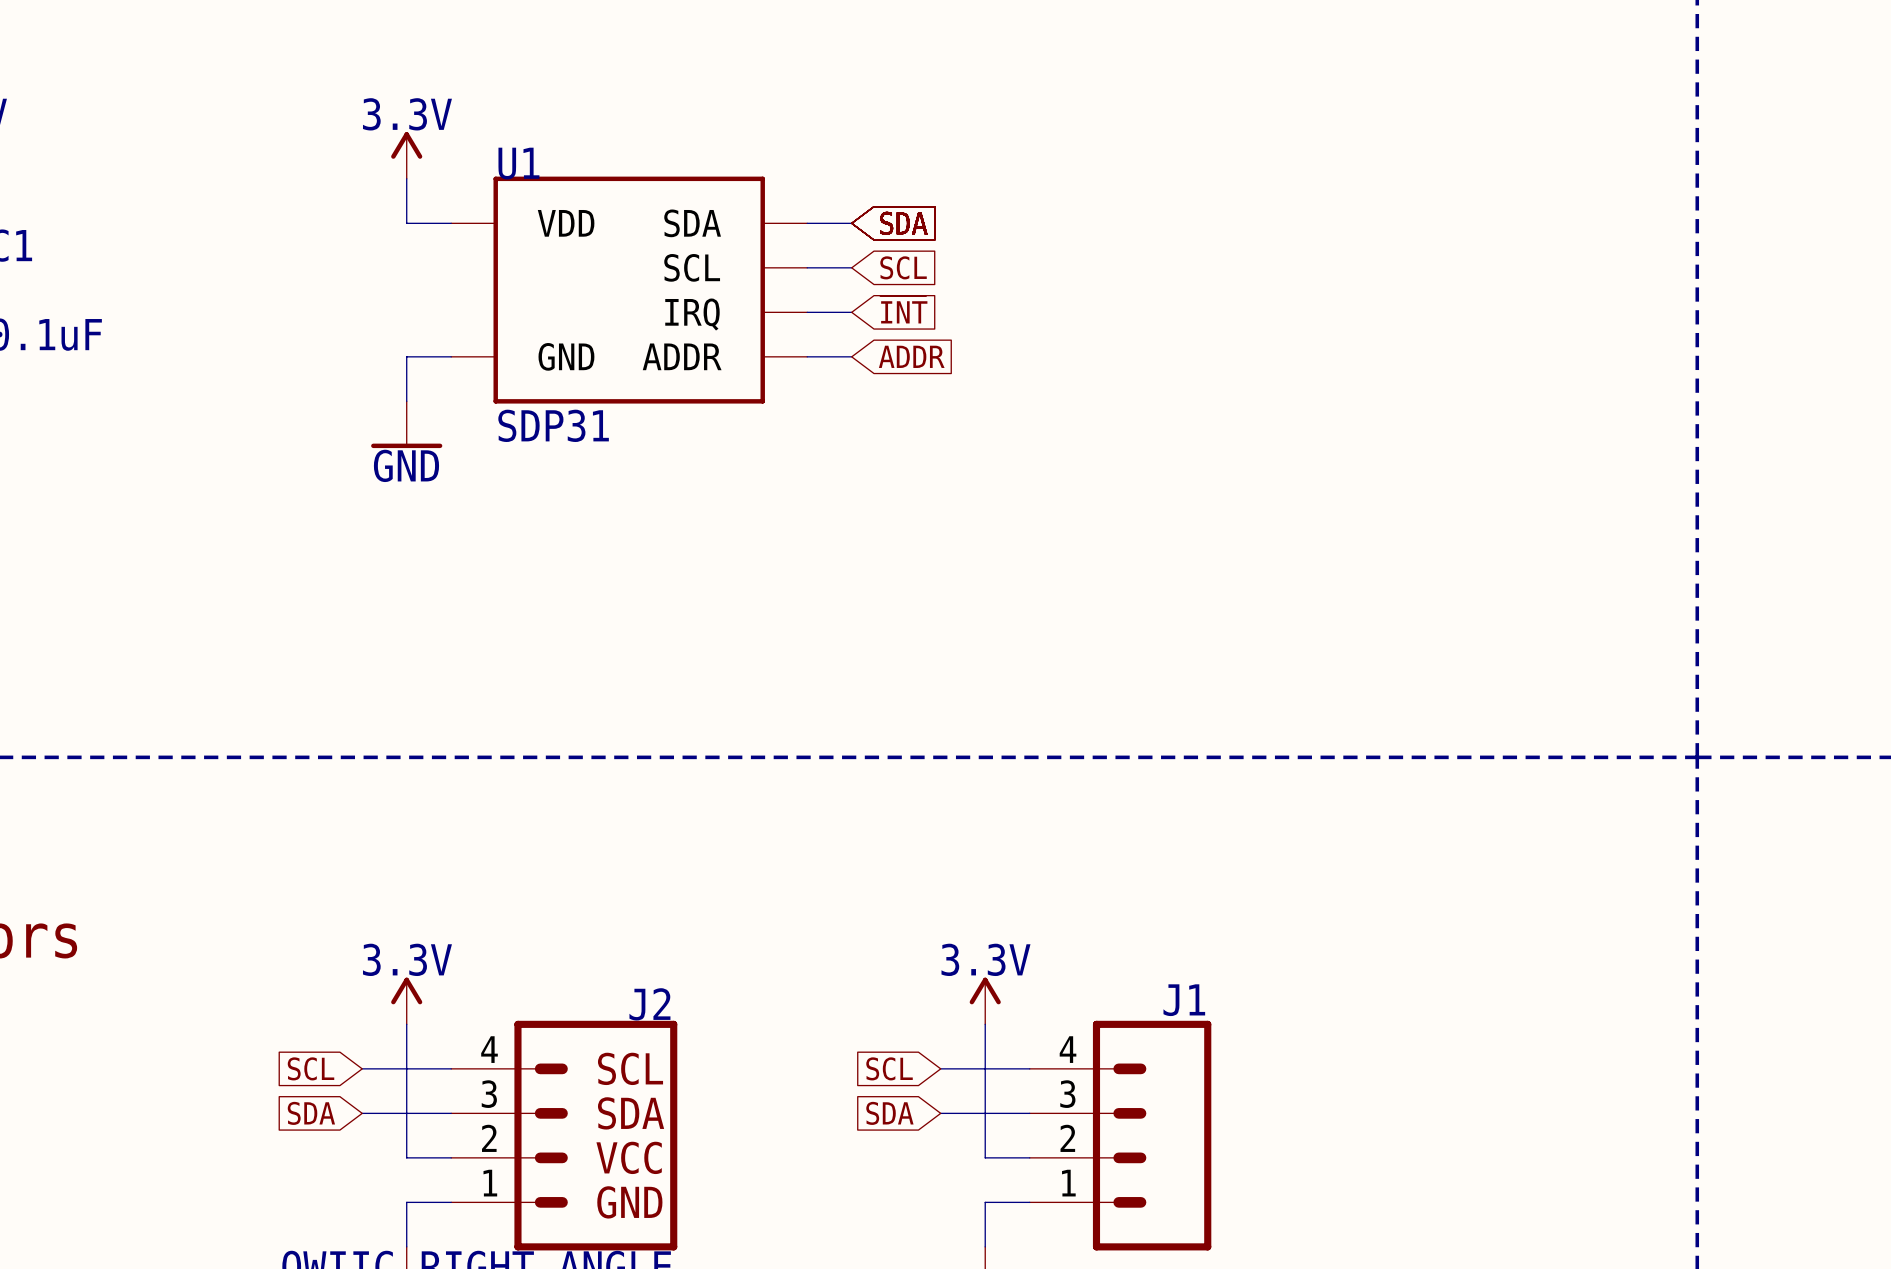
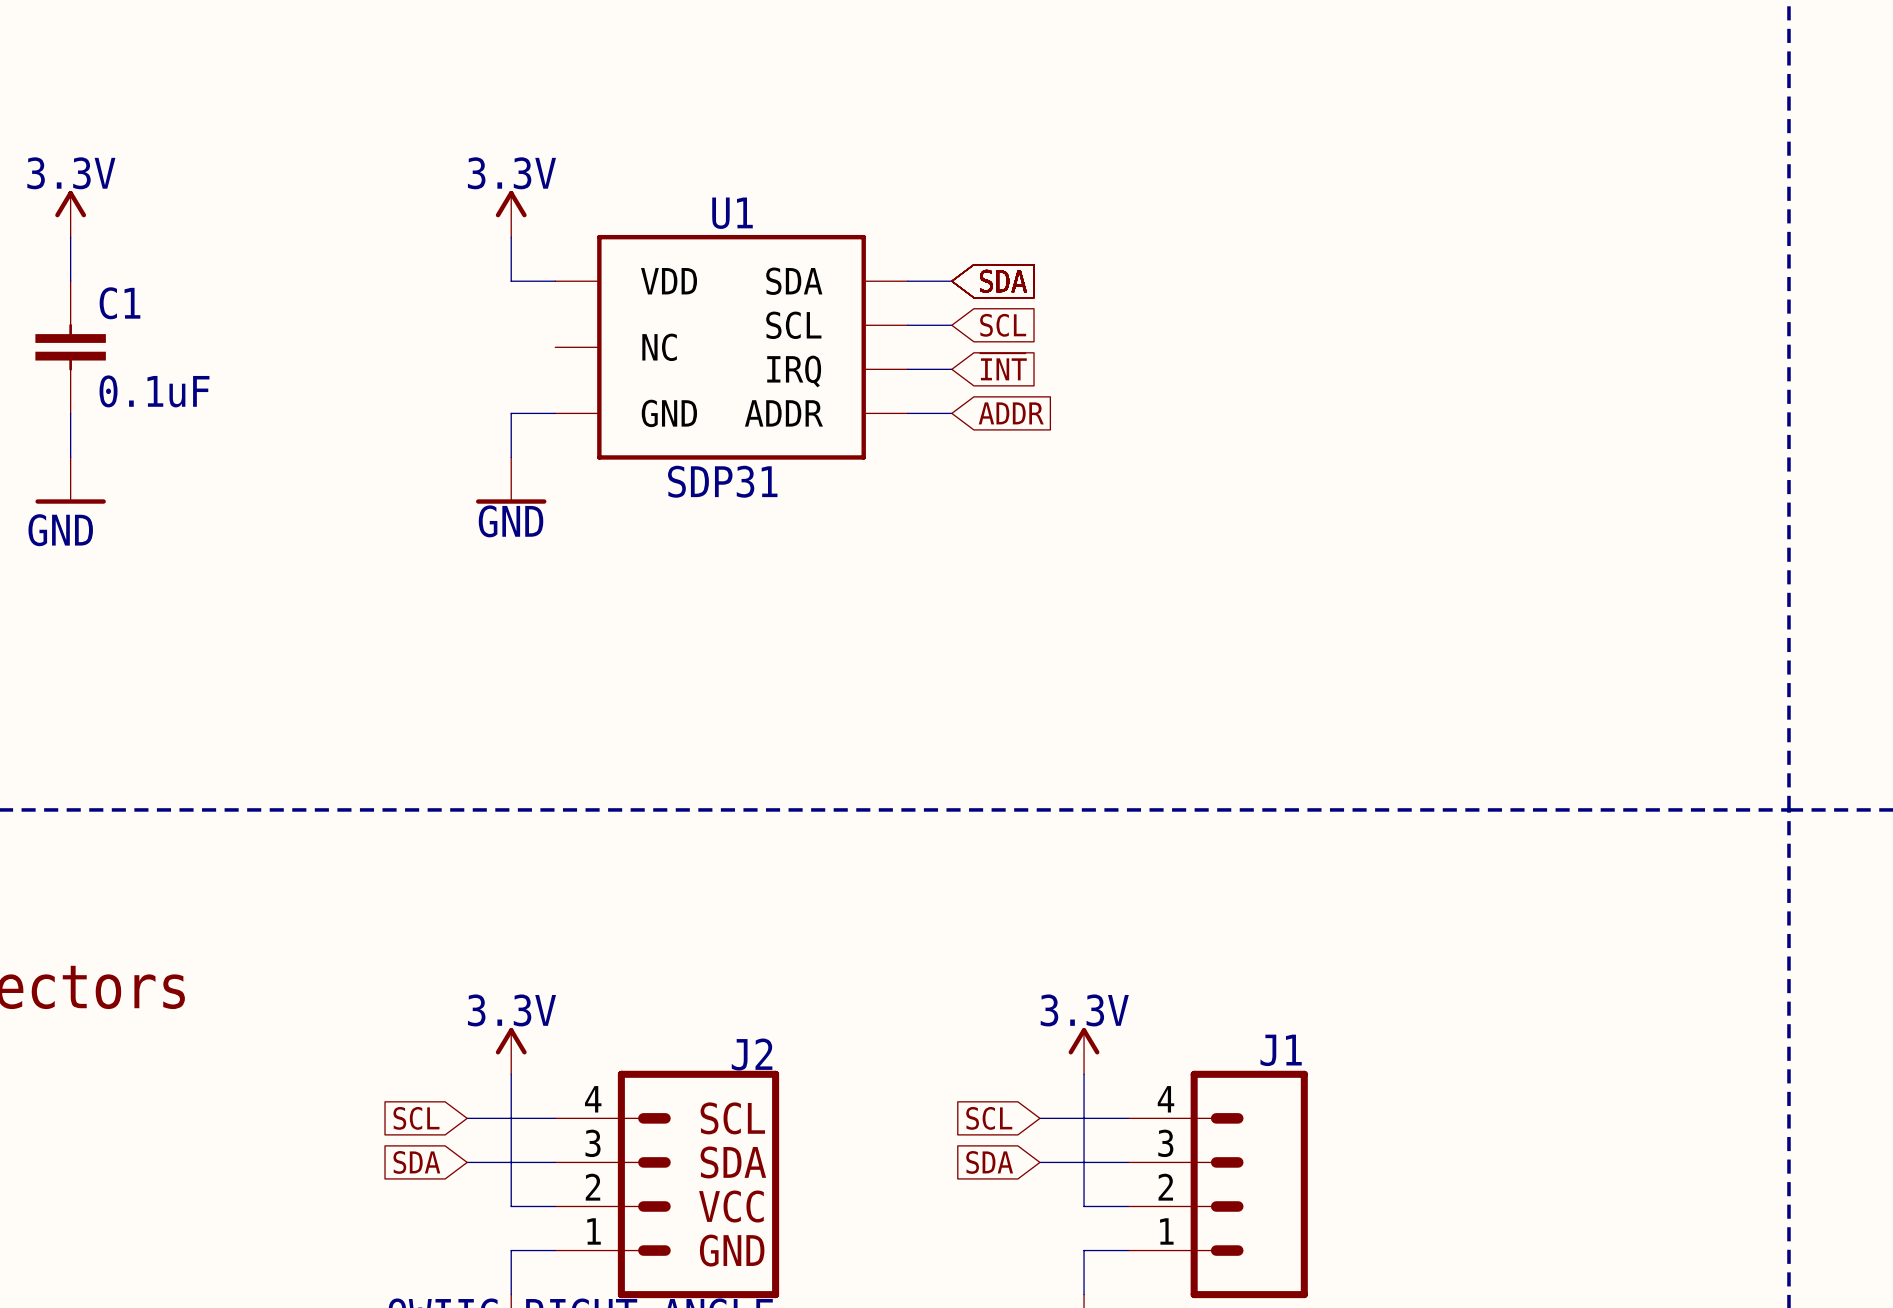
U1 name position: U1 (518, 163) -> U1 (732, 213)
U1 symbol: [451, 176, 808, 404] -> [555, 234, 908, 460]
U1 value position: SDP31 (553, 425) -> SDP31 (722, 481)

